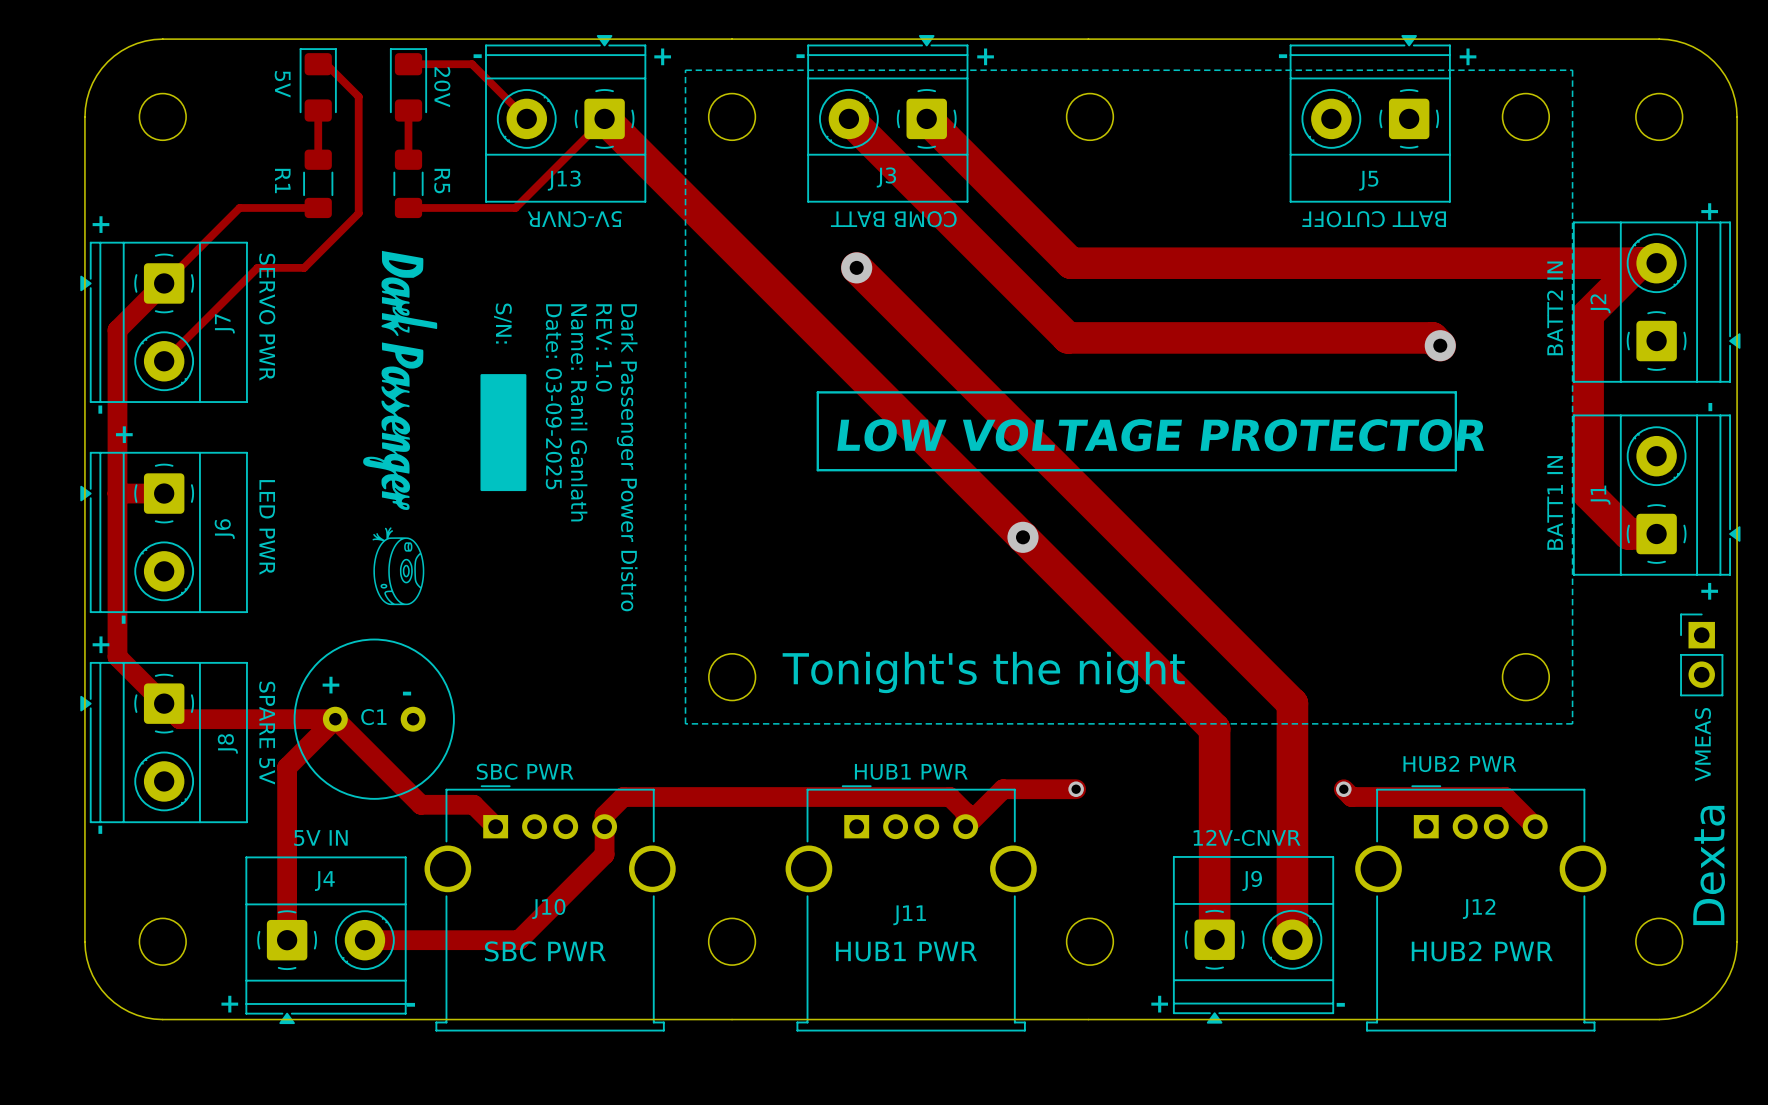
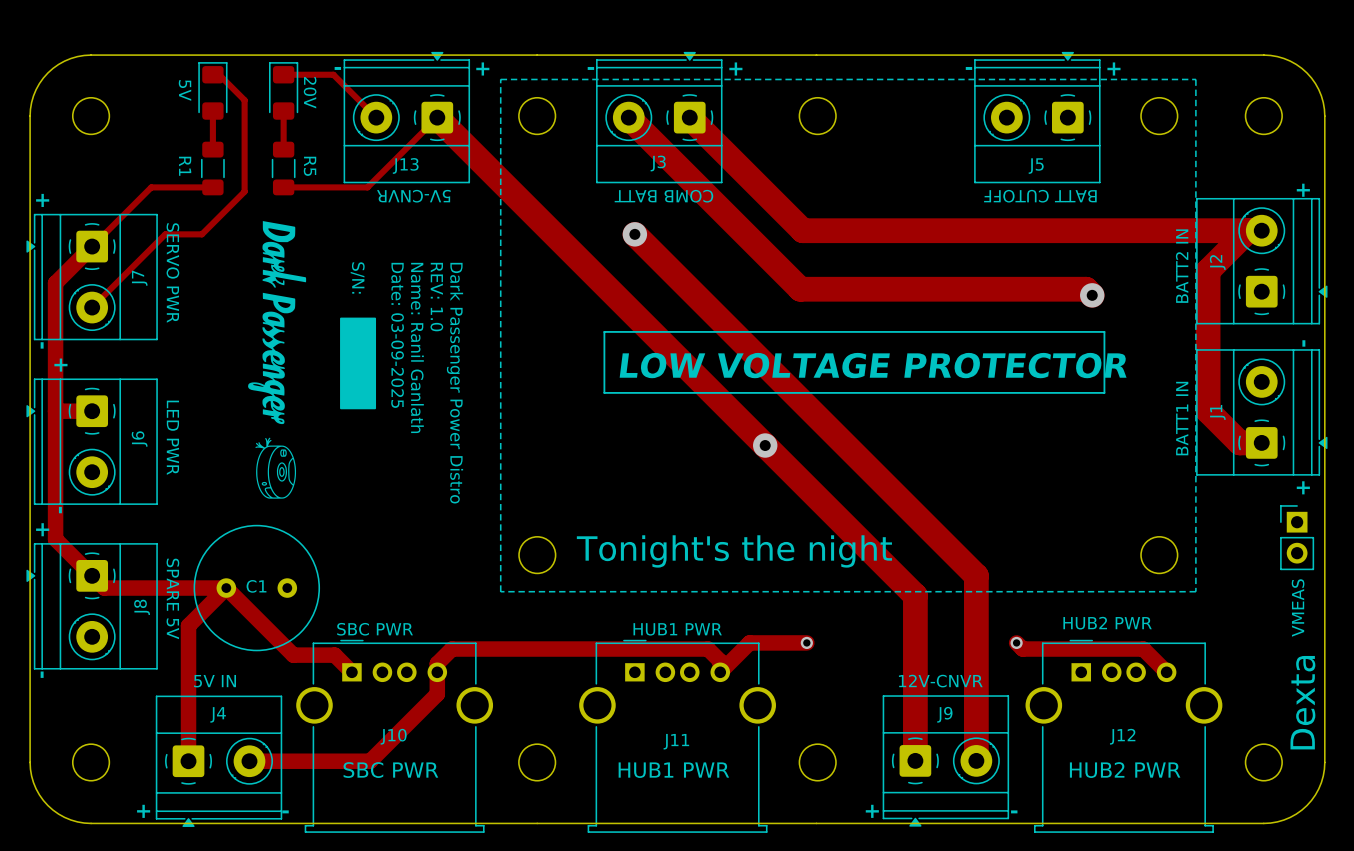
text: + (330, 685) -> none
text: - (407, 693) -> none

